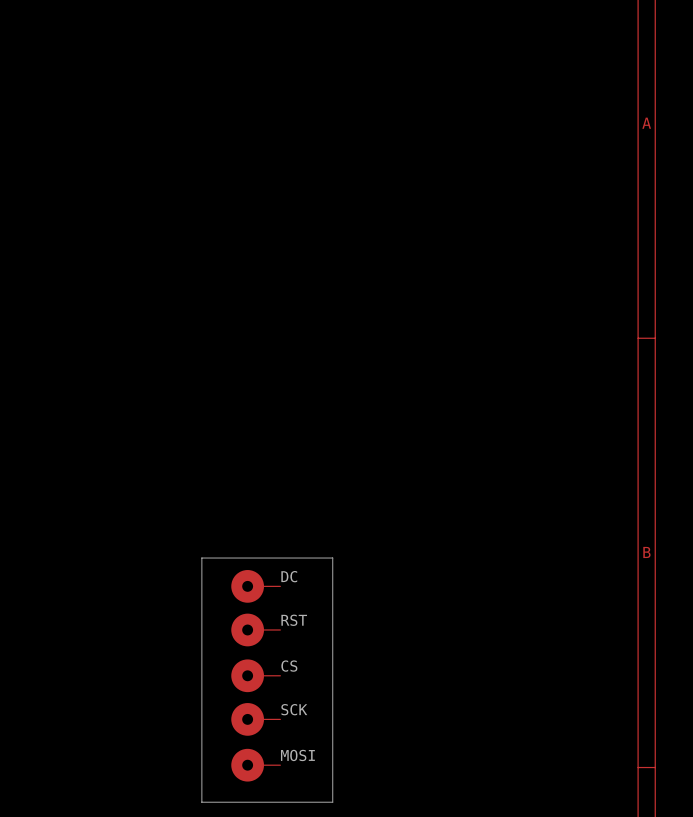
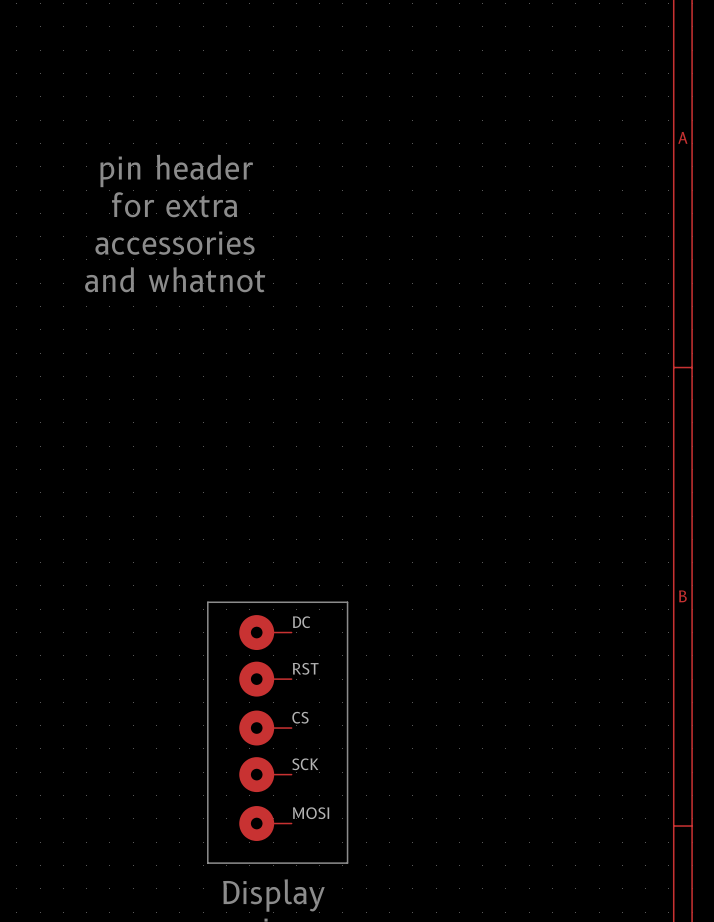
text: none -> pin header (176, 170)
text: none -> for extra (174, 204)
text: none -> accessories (175, 243)
text: none -> and whatnot (175, 279)

